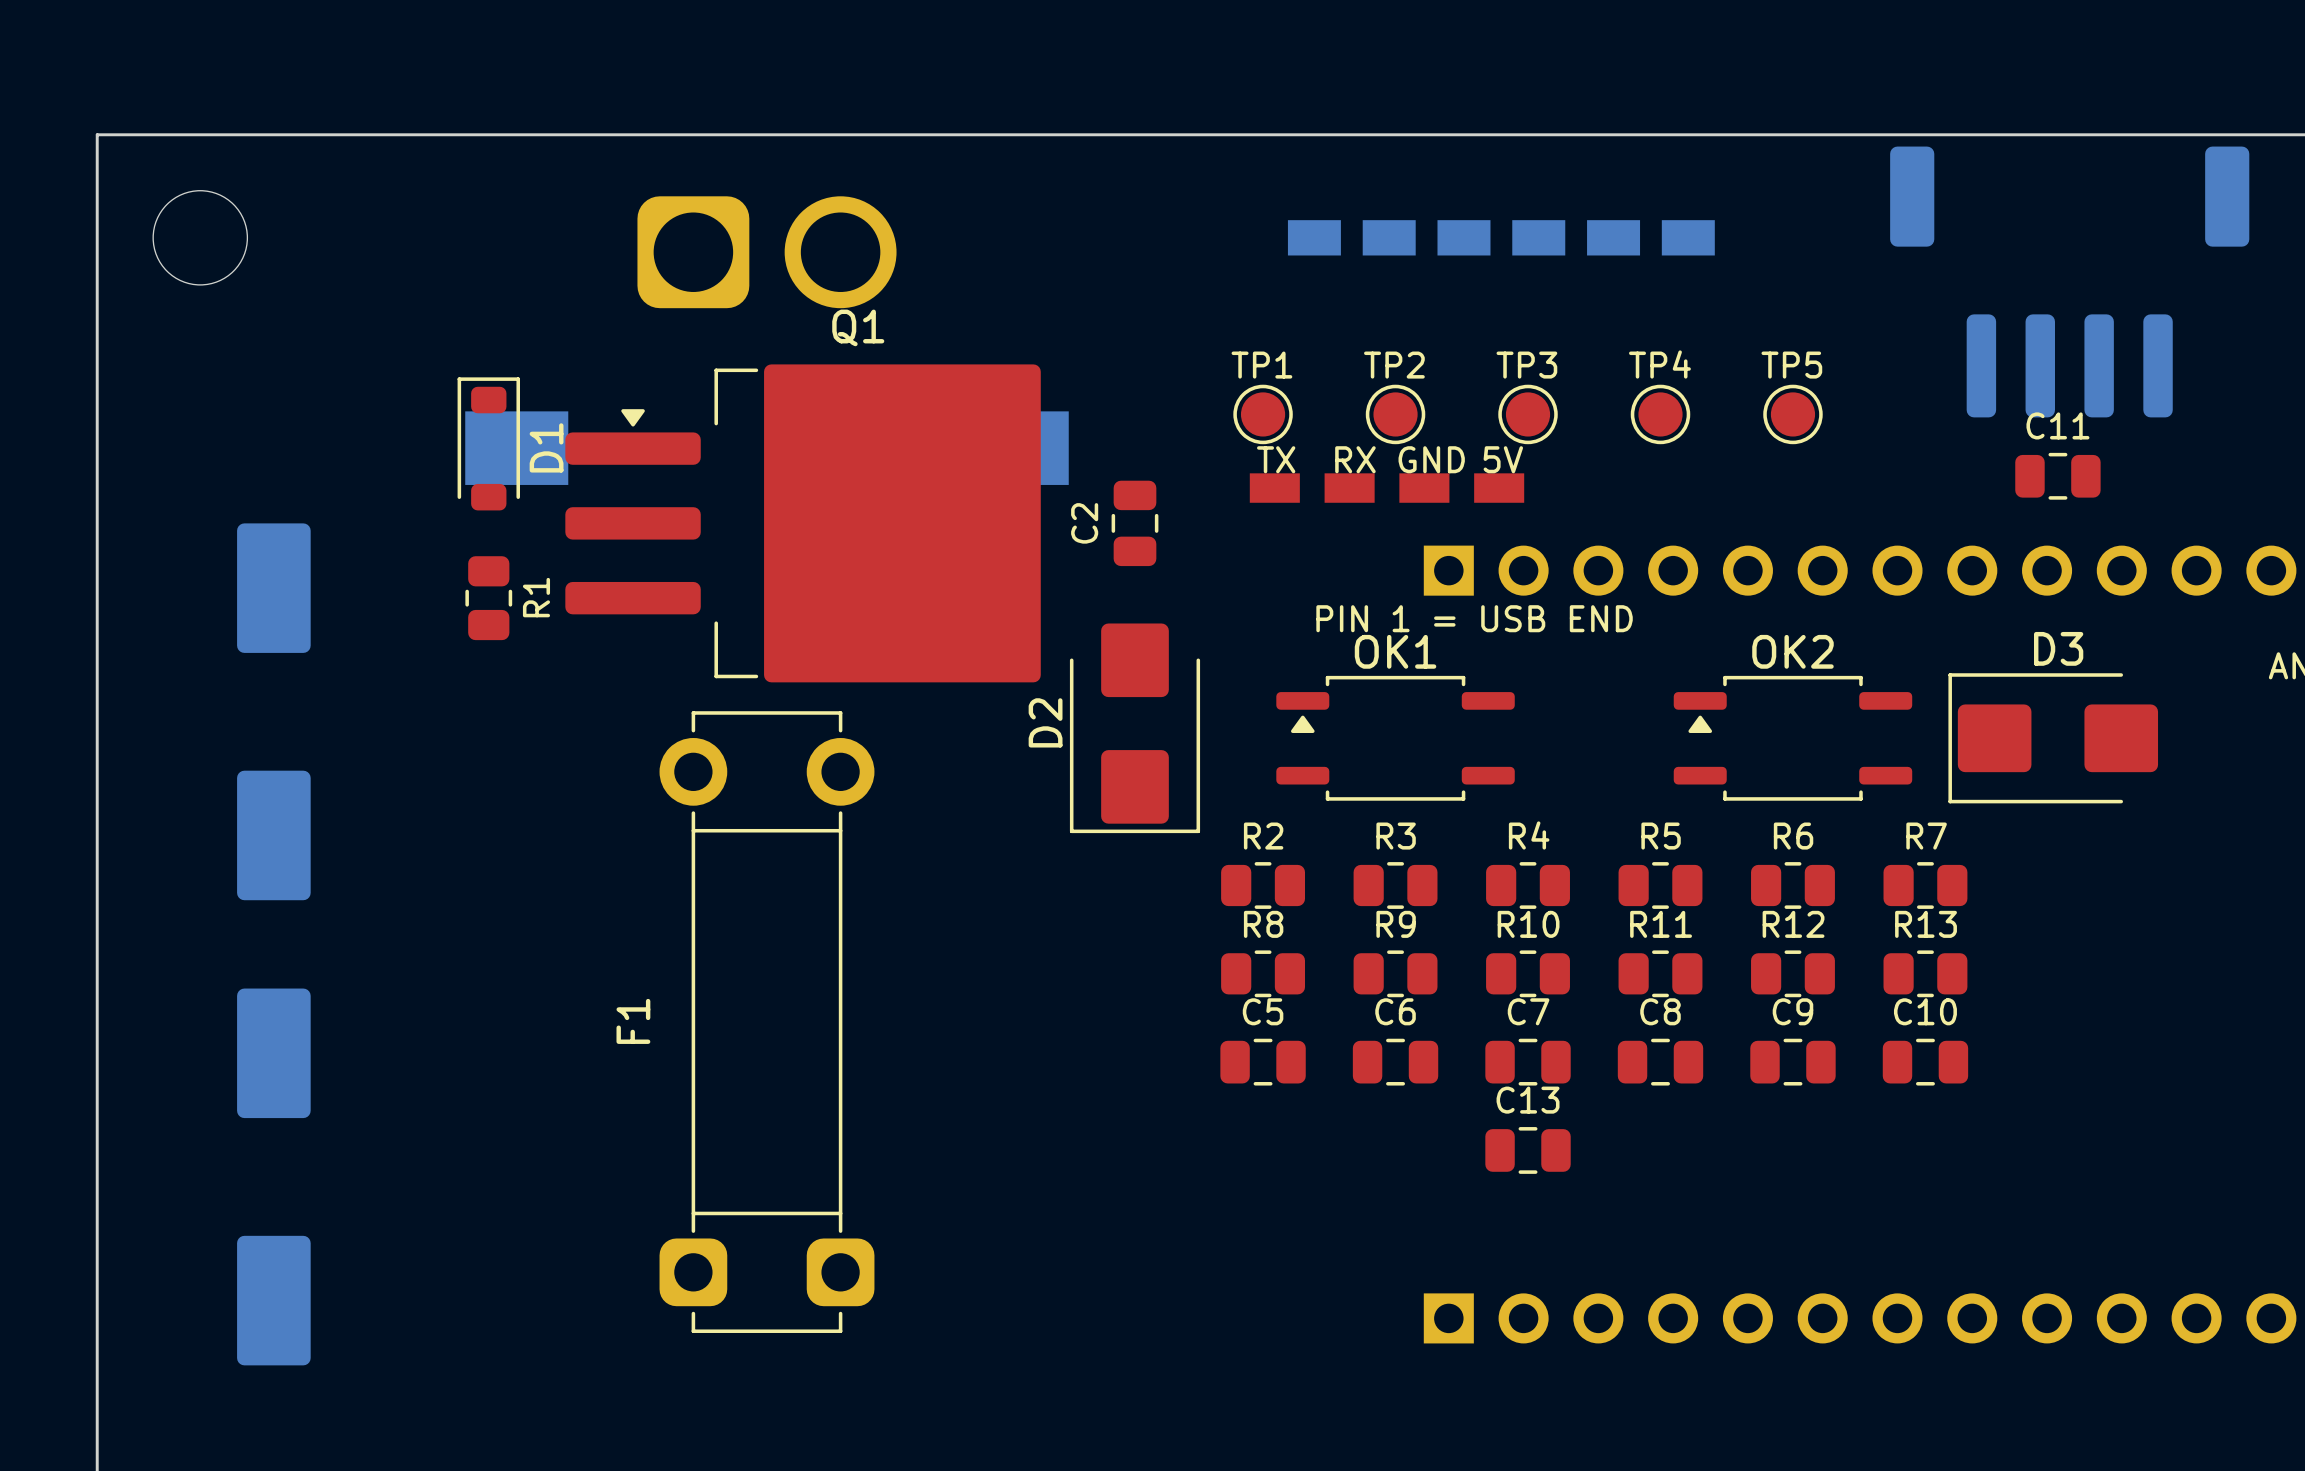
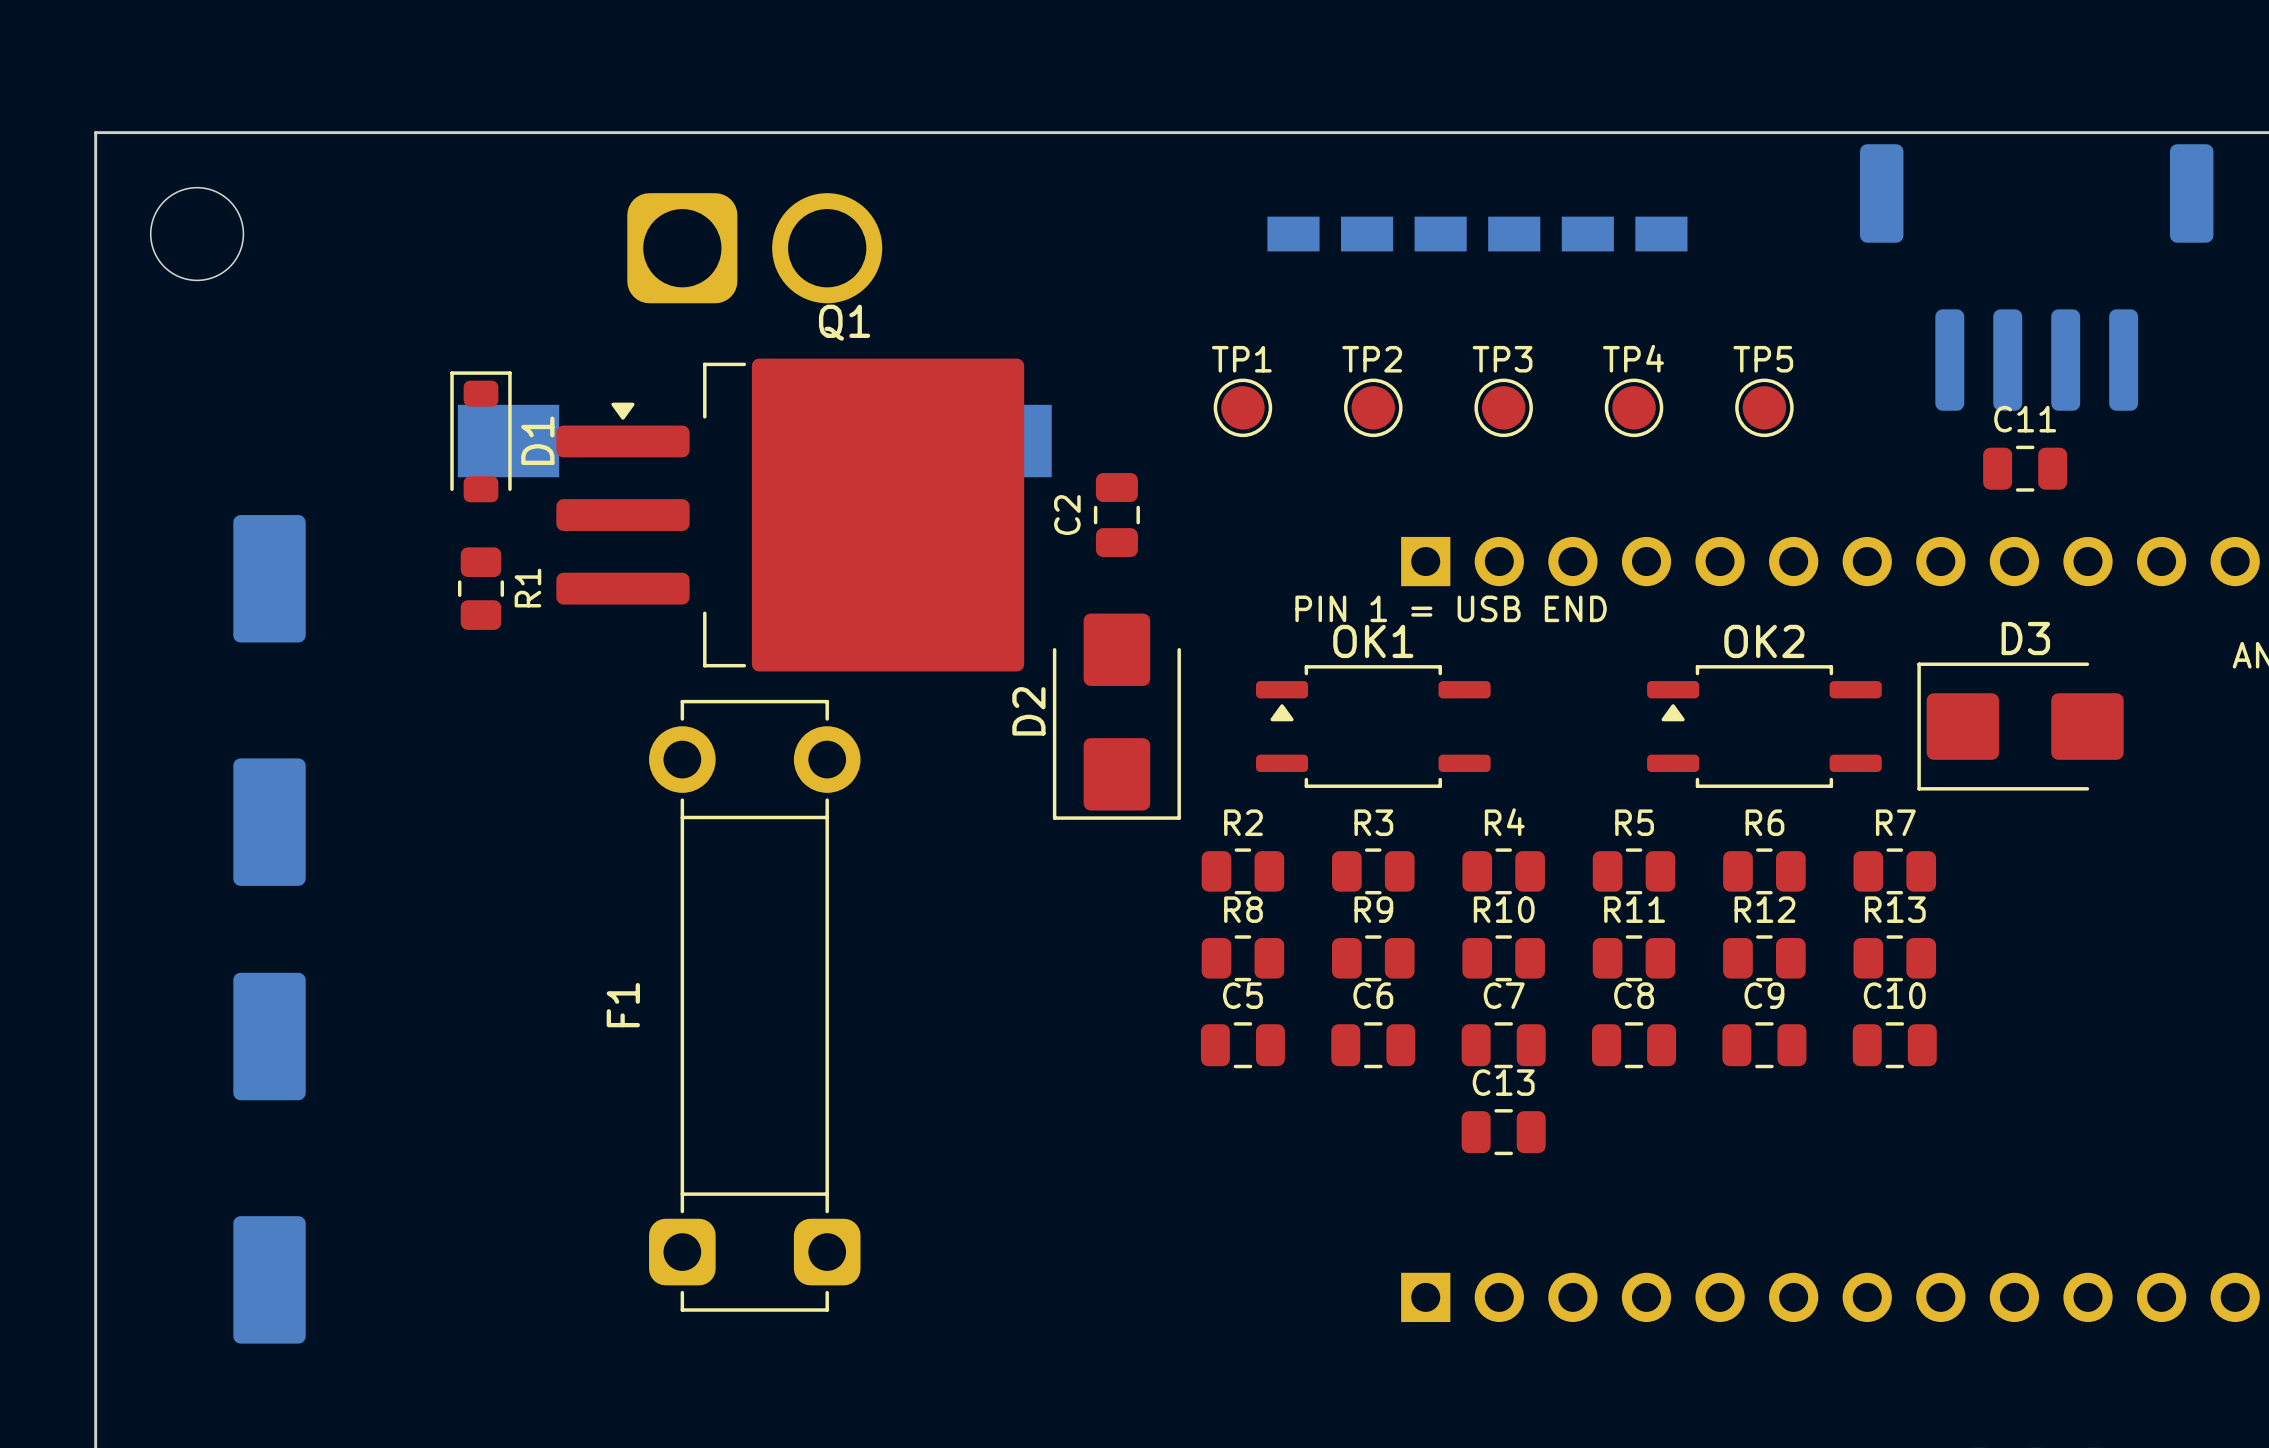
text: TX (1276, 459) -> none
text: RX (1355, 459) -> none
text: GND (1431, 459) -> none
text: 5V (1503, 459) -> none
part: (1387, 488) -> none

